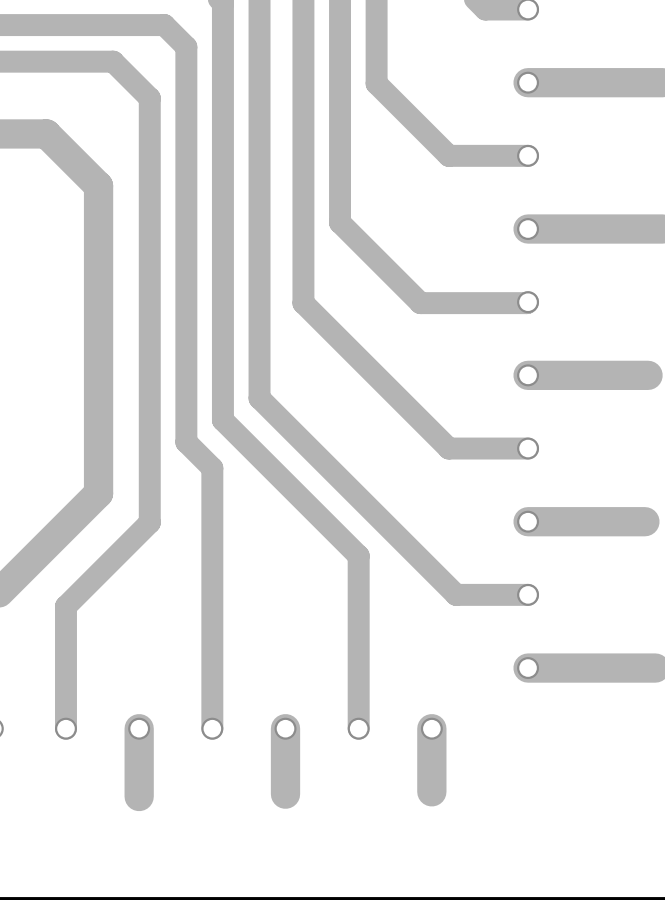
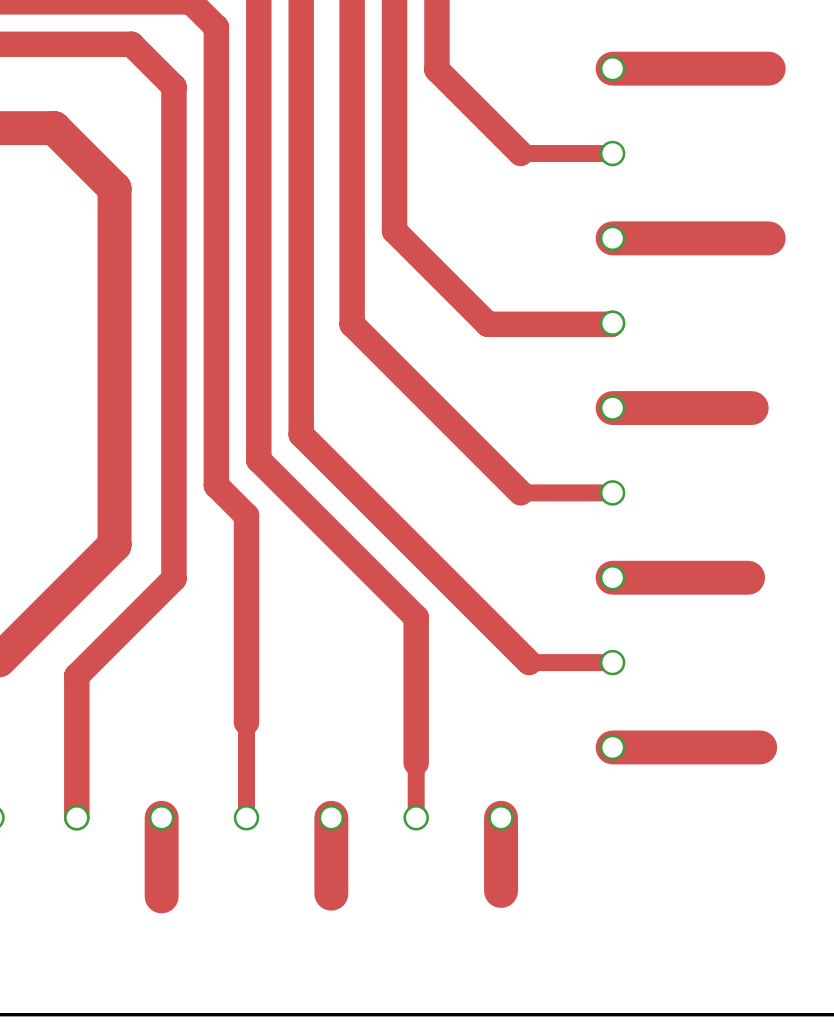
track width: thick (448, 155) (528, 155) -> thin (520, 153) (612, 153)
track width: thick (448, 448) (528, 448) -> thin (520, 492) (612, 492)
track width: thick (456, 594) (528, 594) -> thin (529, 662) (612, 662)
track width: thick (212, 646) (212, 728) -> thin (246, 722) (246, 817)
track width: thick (358, 681) (358, 728) -> thin (416, 763) (416, 817)

